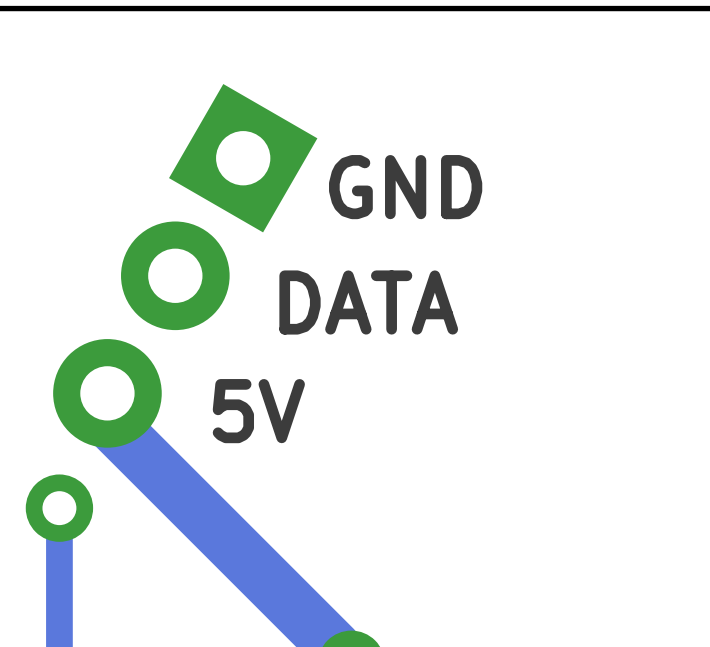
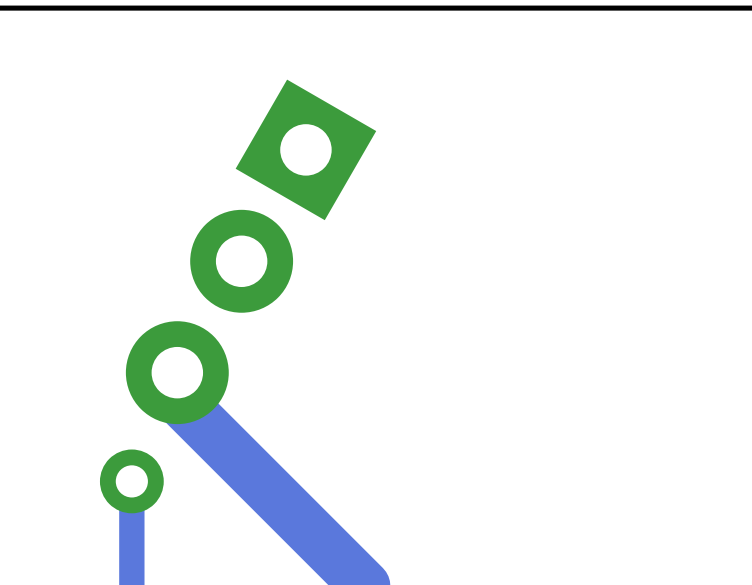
text: GND (405, 187) -> none
text: DATA (368, 302) -> none
text: 5V (258, 411) -> none

